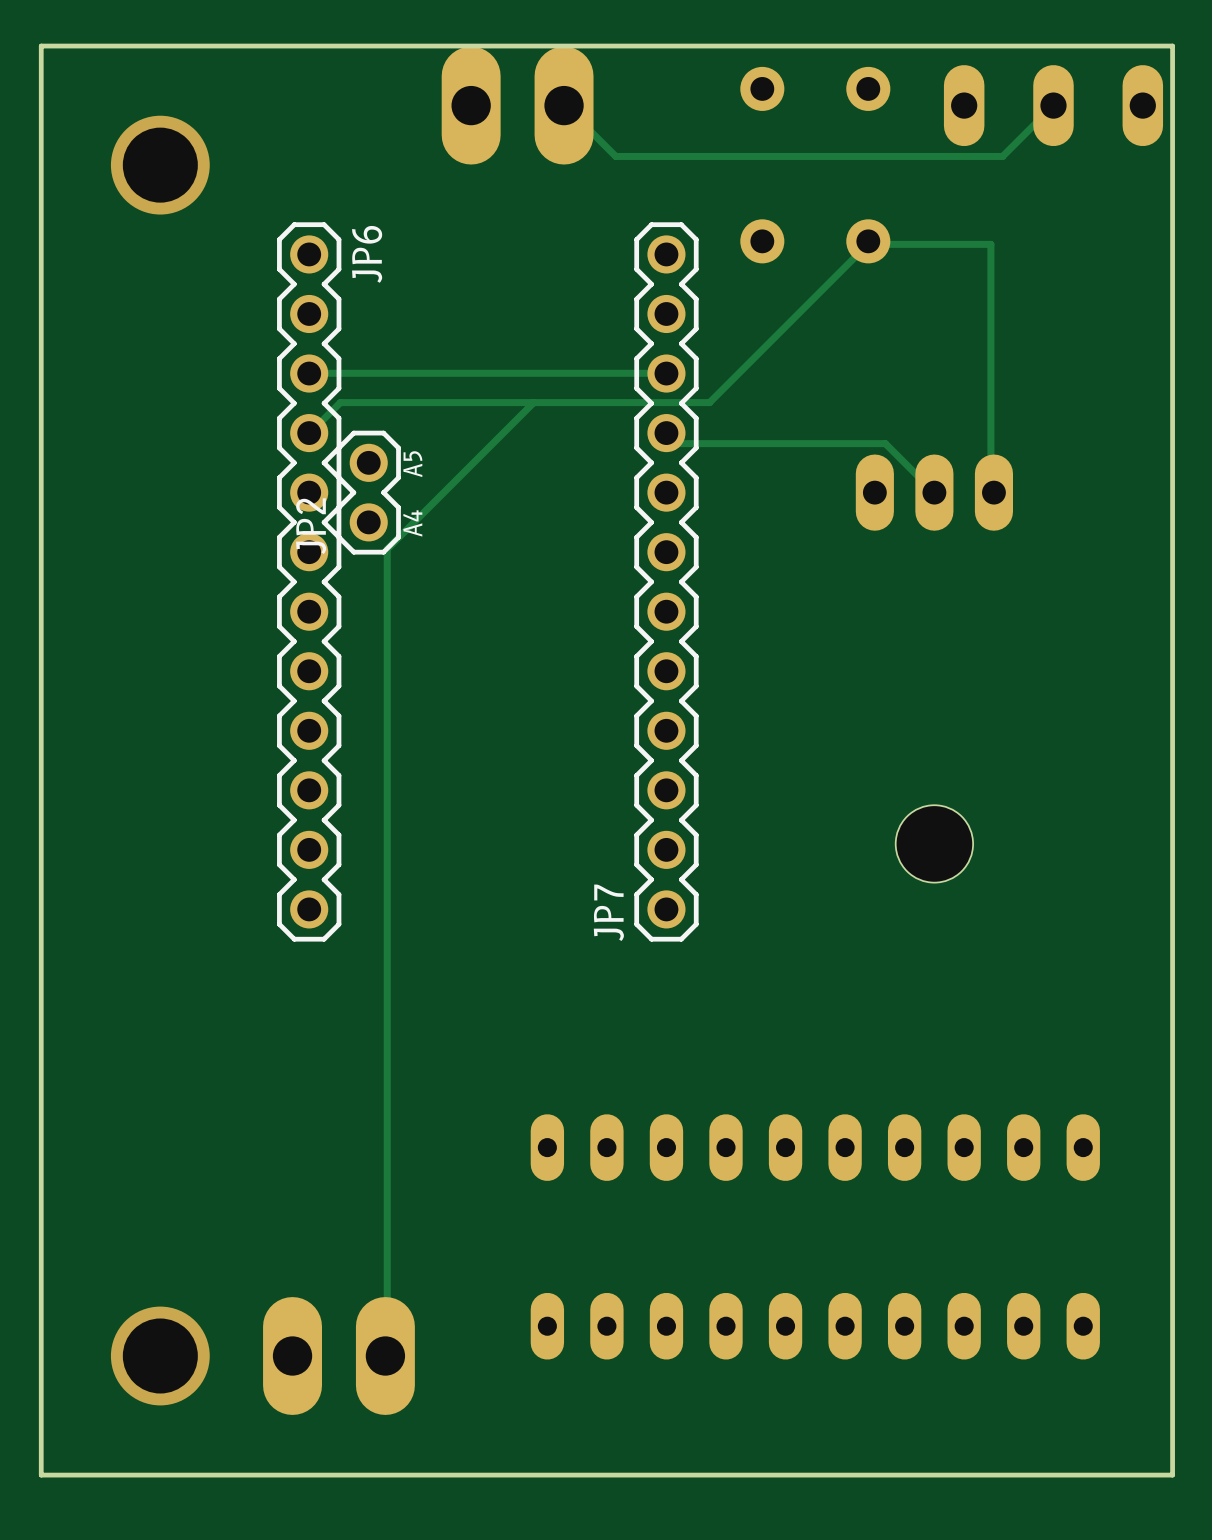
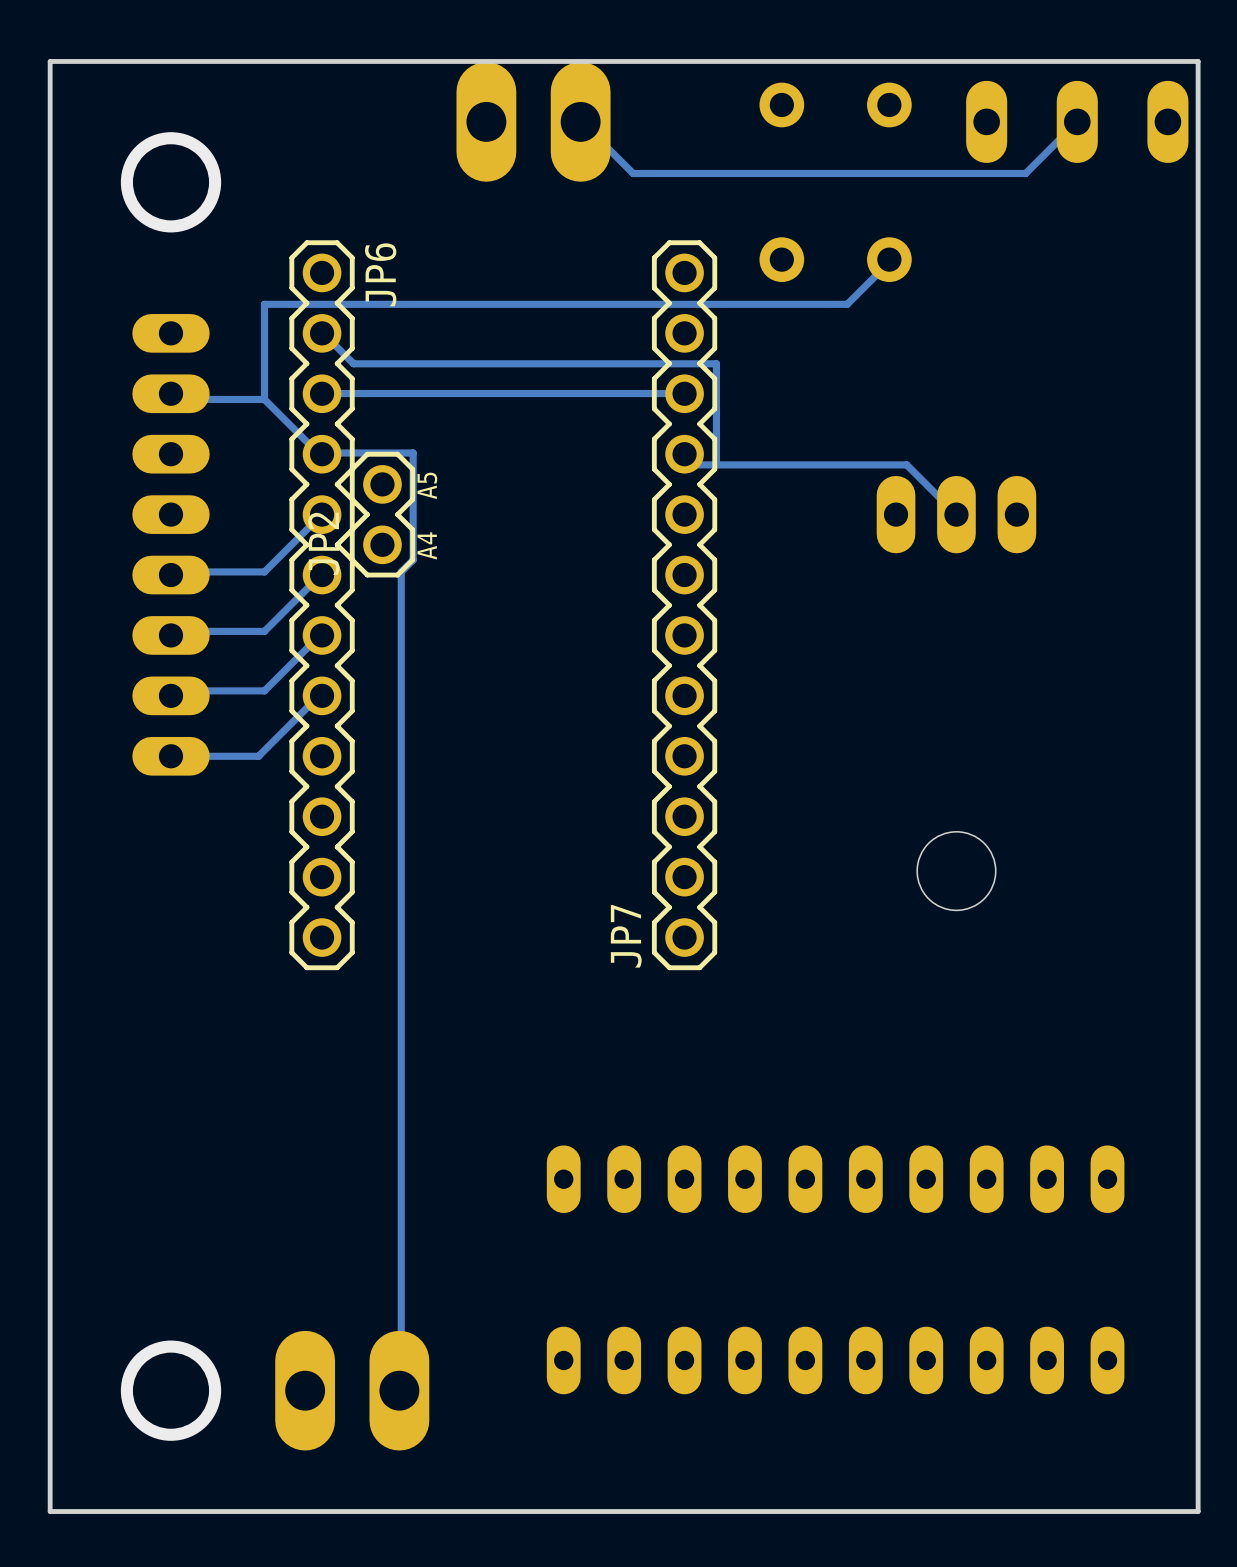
track: (868, 241) (873, 244) (990, 244) (990, 490) (993, 492) -> none
track: (826, 285) (709, 402) (340, 402) (311, 431) -> (847, 304) (264, 304) (264, 399)
track: none -> (322, 333) (353, 363) (716, 363) (716, 464)
track: none -> (171, 393) (175, 399) (264, 399)
track: none -> (264, 399) (318, 453) (322, 454)
track: (533, 402) (398, 537) -> (323, 453) (413, 453) (413, 560)
track: none -> (322, 514) (264, 571) (175, 571) (171, 575)
part: none -> (171, 544)
track: none -> (322, 575) (264, 631) (175, 631) (171, 635)
track: none -> (322, 635) (264, 690) (175, 690) (171, 695)
track: none -> (322, 695) (318, 696) (258, 756) (171, 756)

